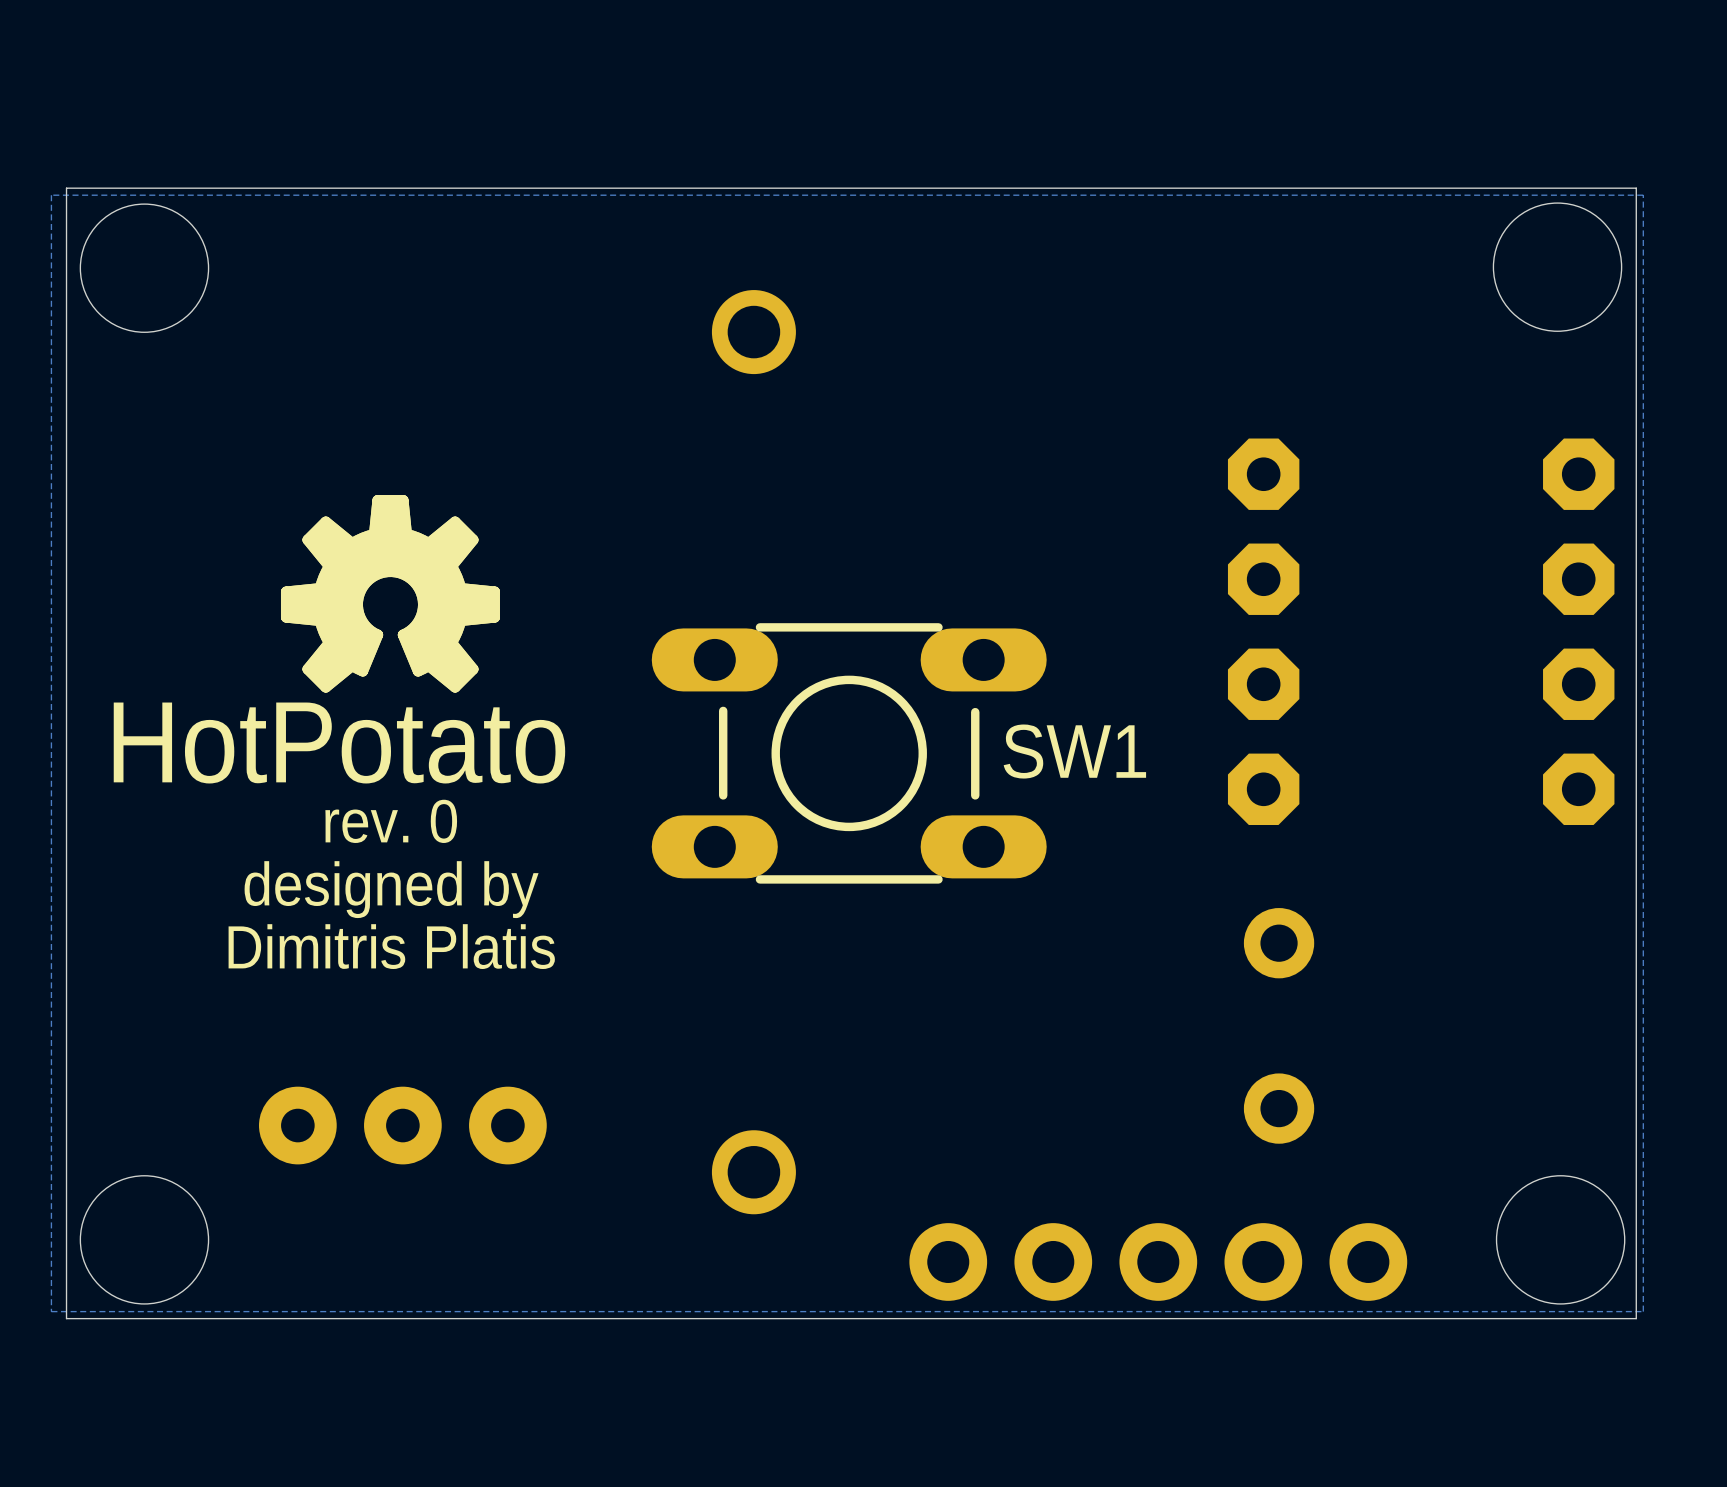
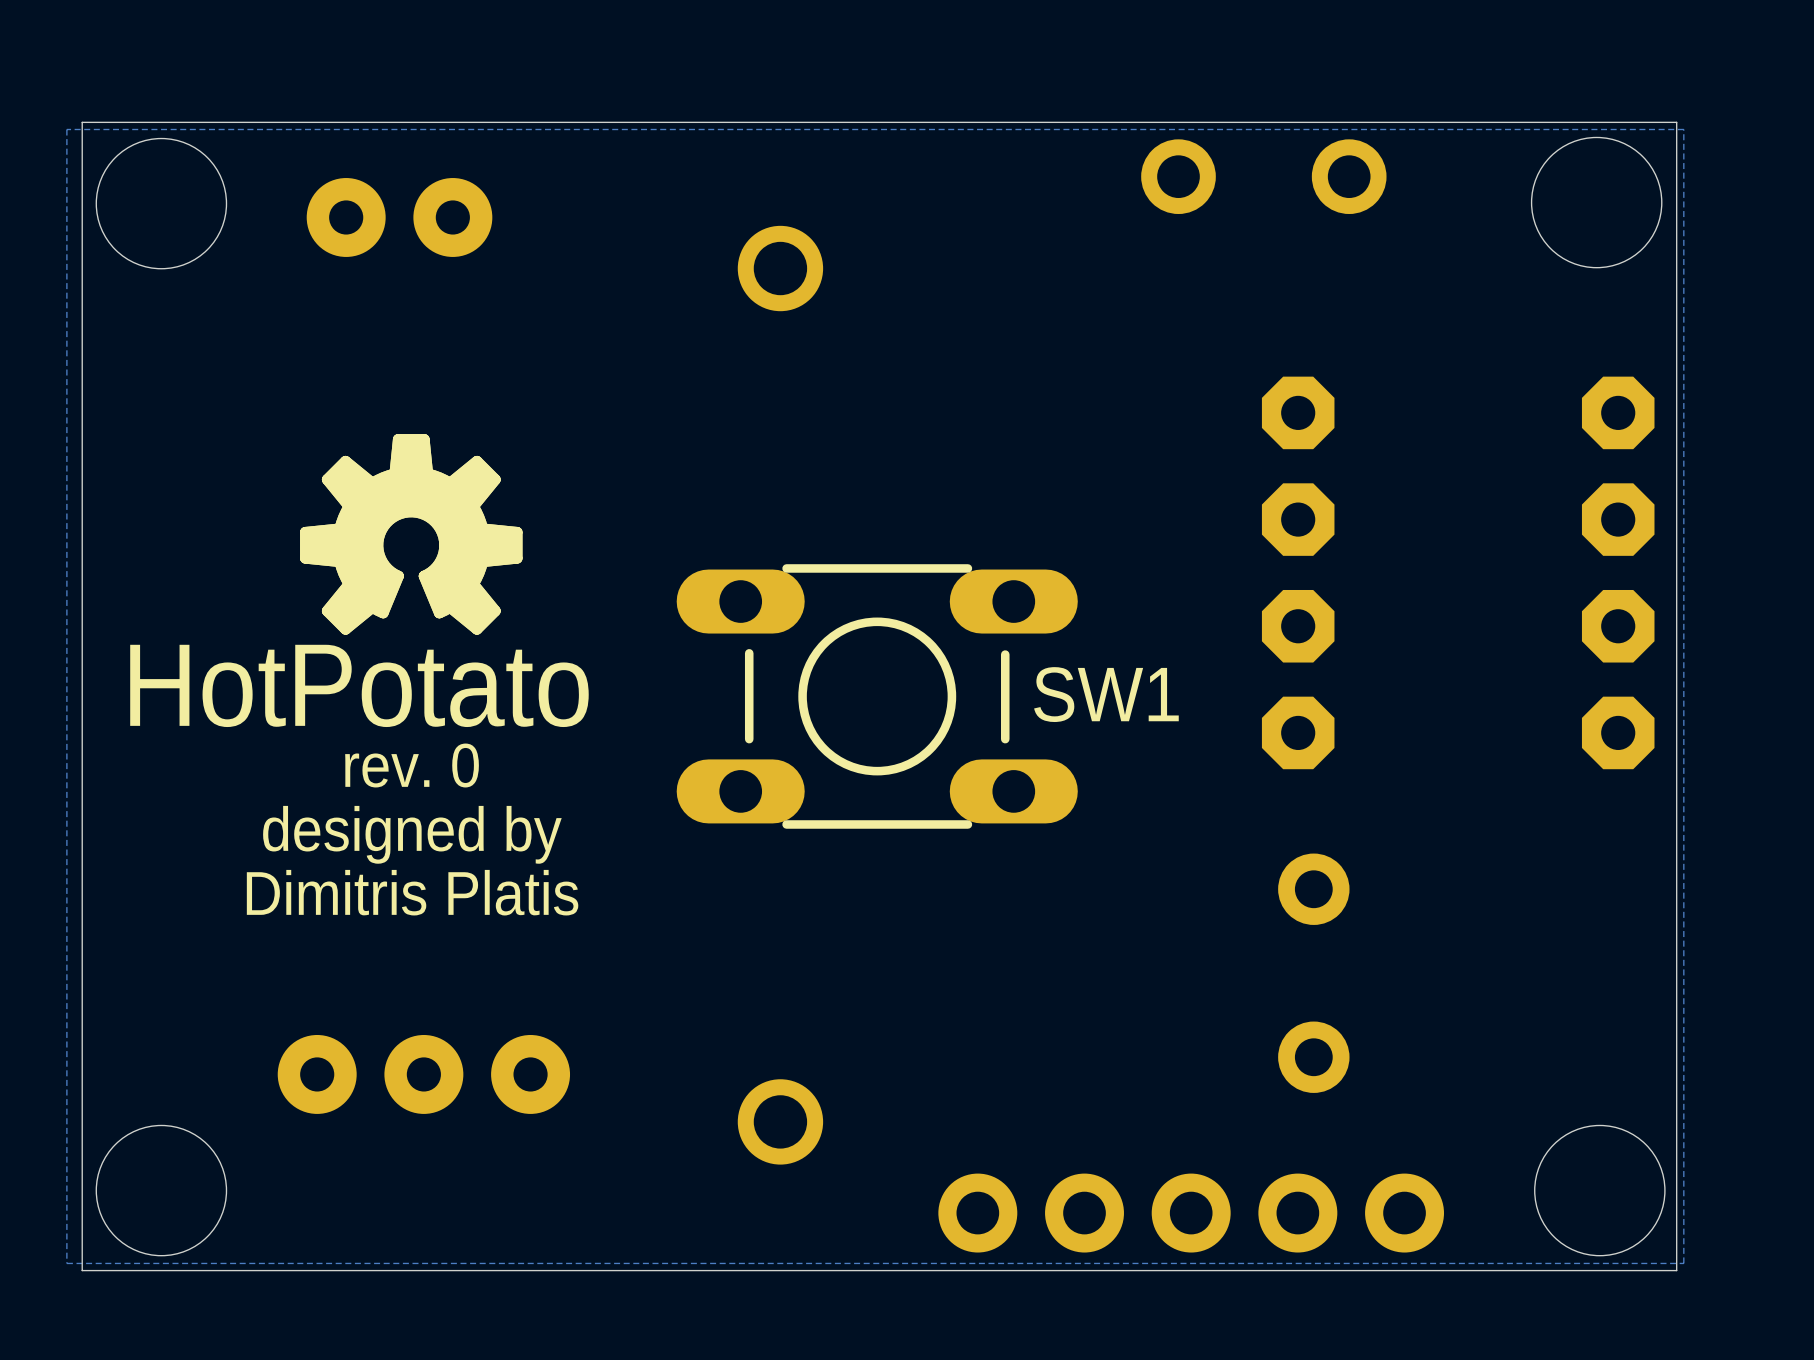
part: none -> (1263, 176)
part: none -> (399, 217)

